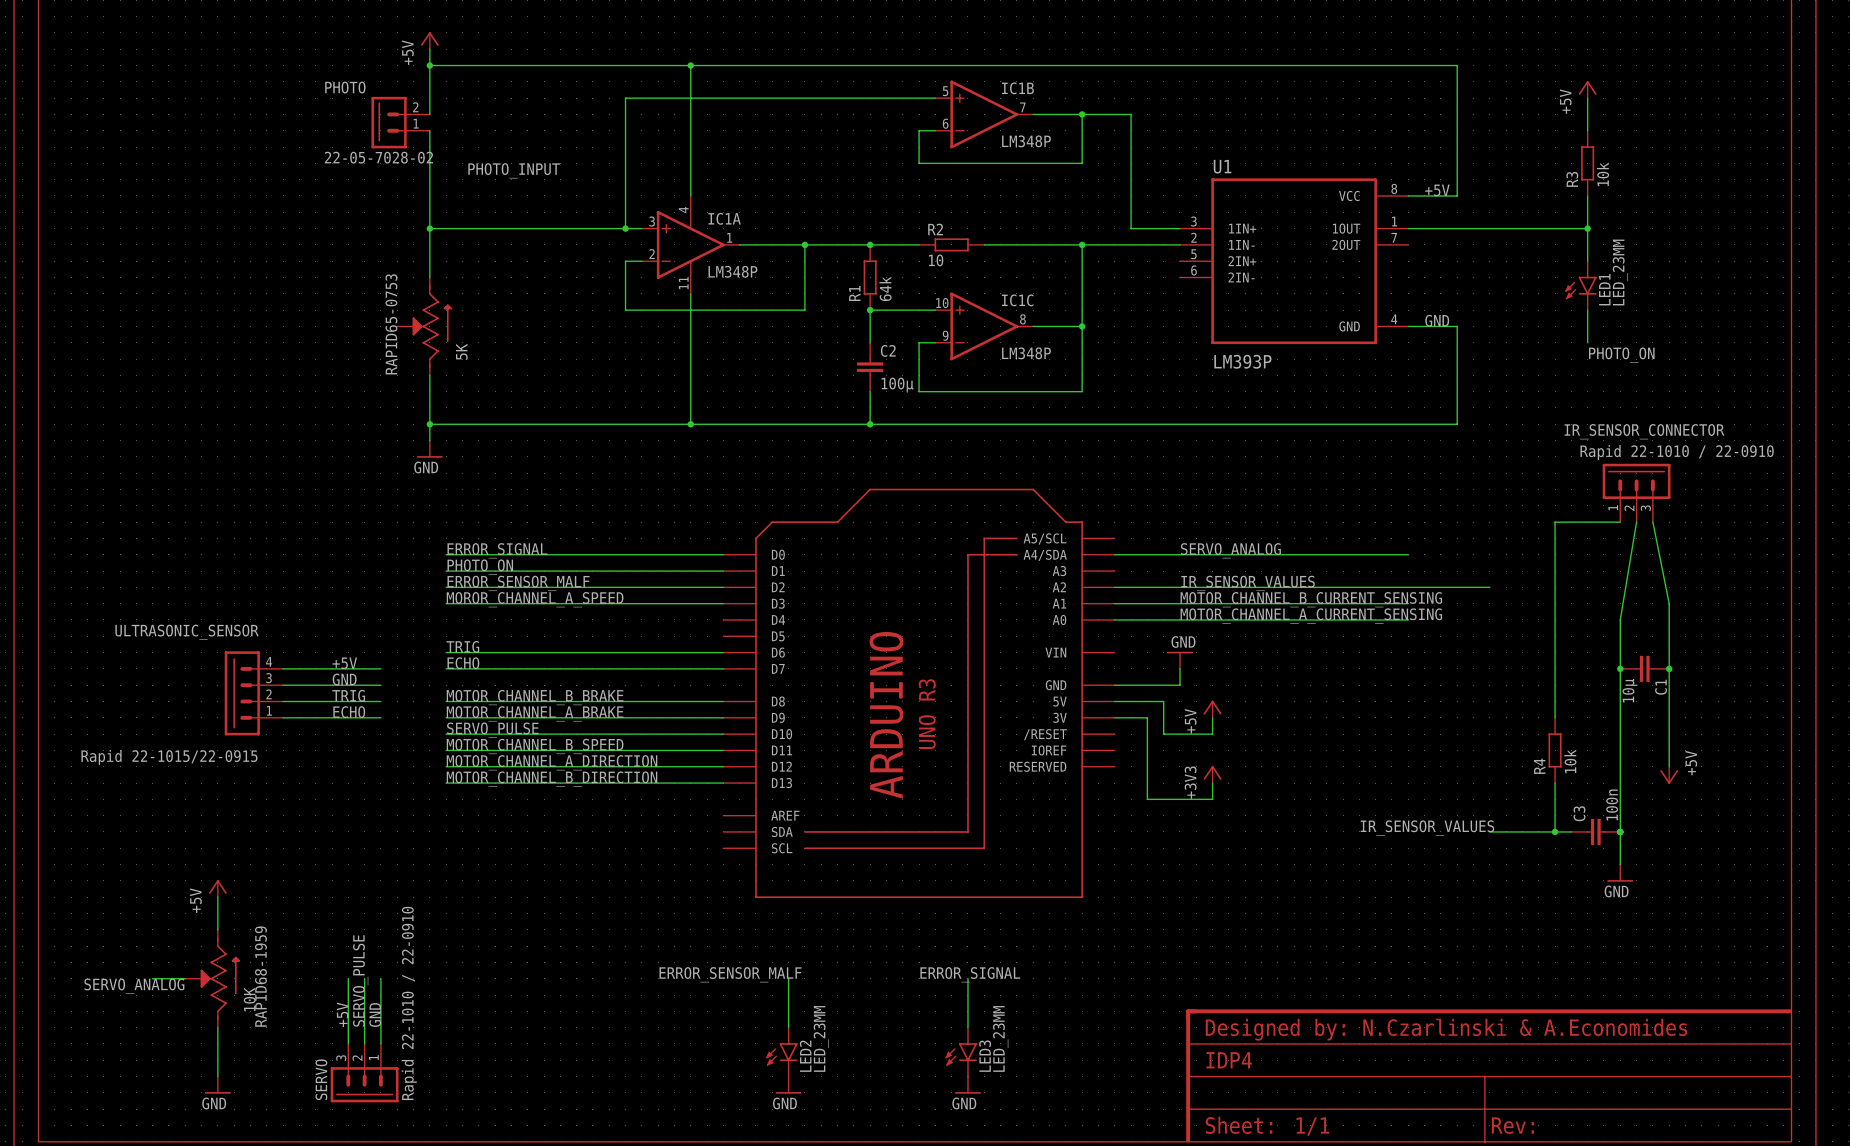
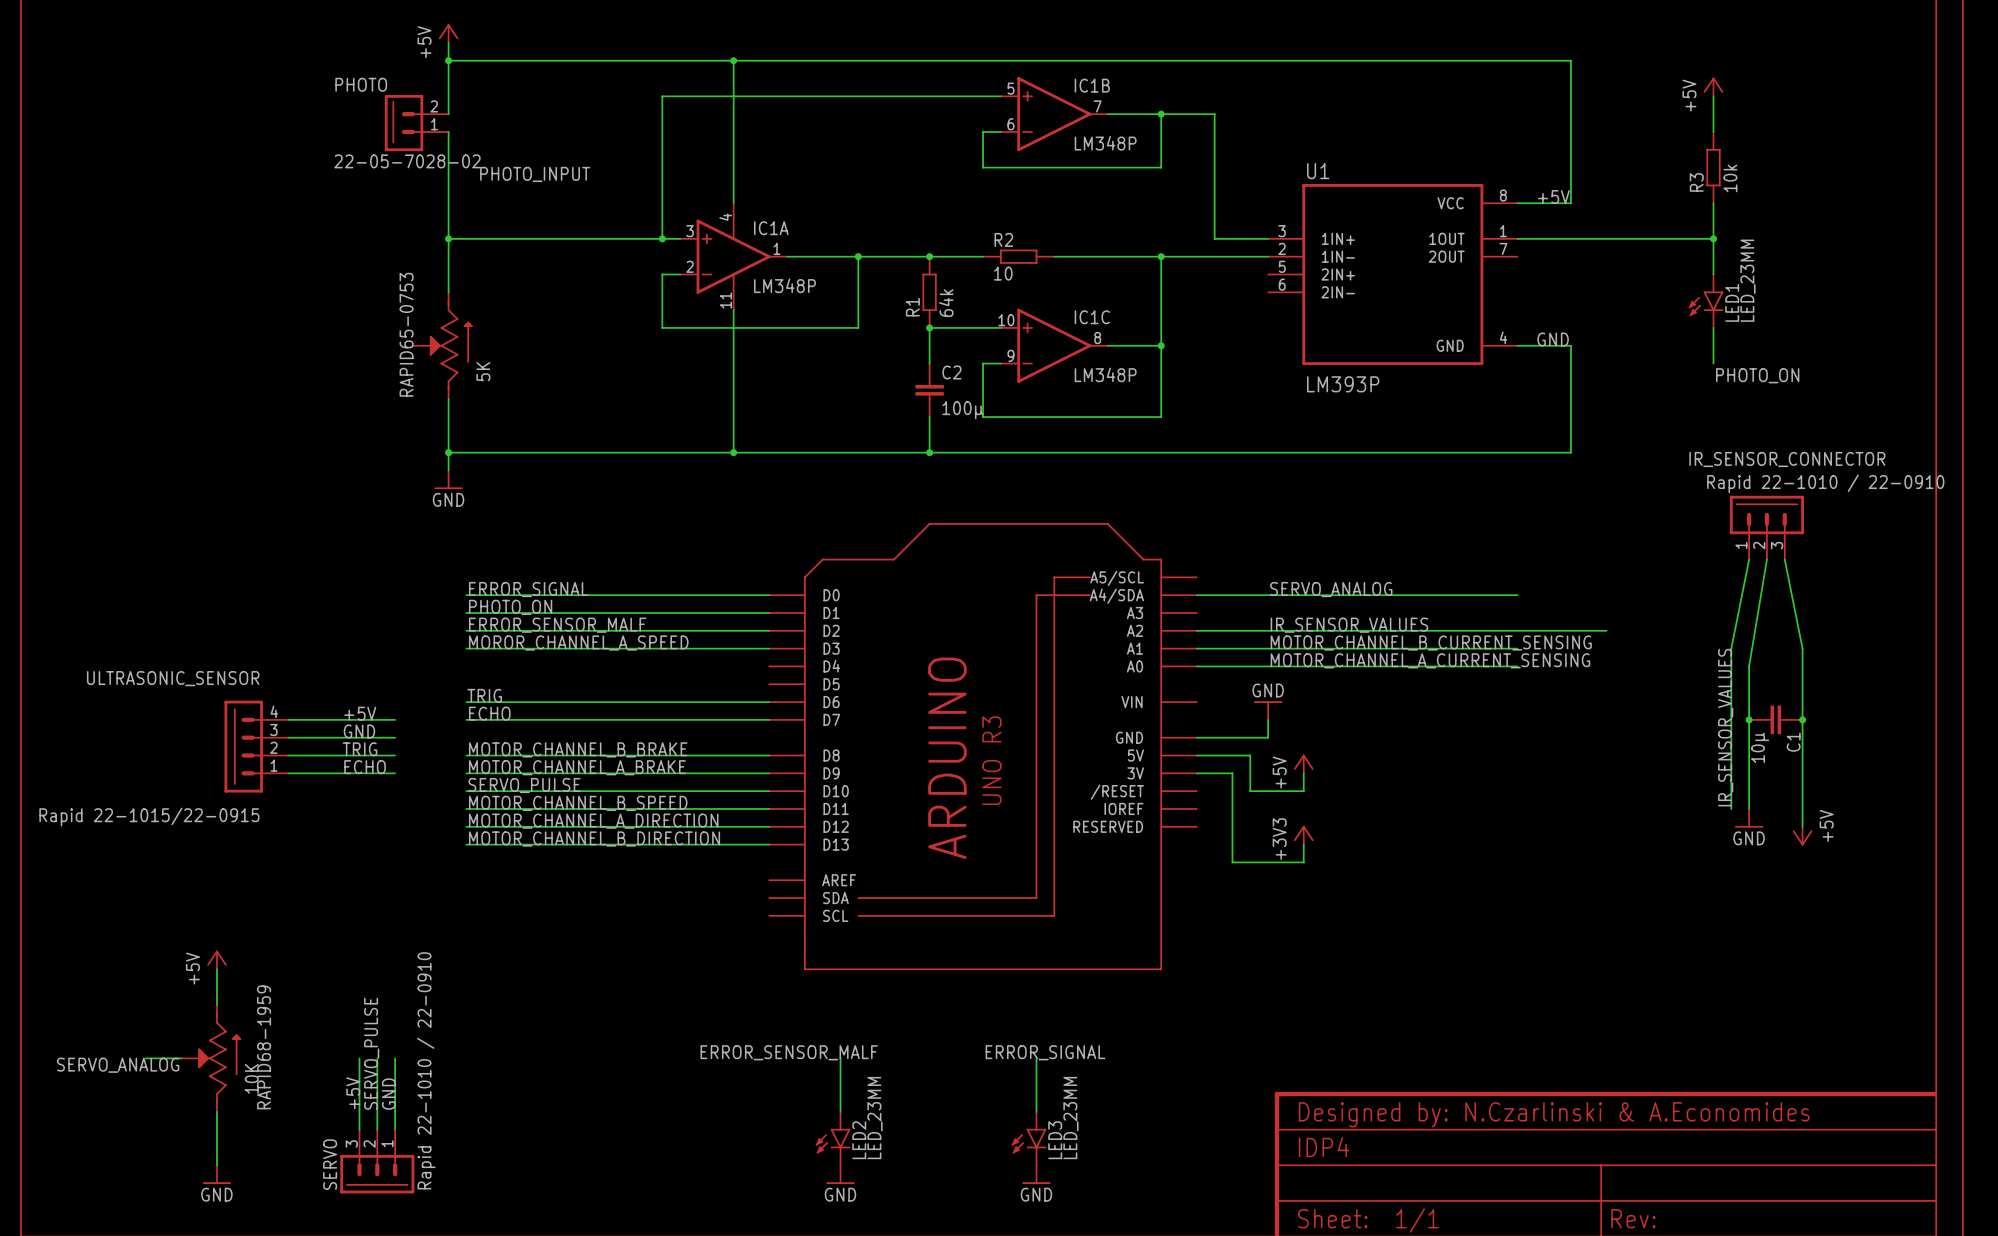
wire: (1620, 522) (1555, 522) (1555, 717) -> (1749, 559) (1731, 648) (1731, 808)
label: none -> IR_SENSOR_VALUES (1725, 727)
R4: 10k (1555, 750) -> none
wire: (1620, 750) (1620, 864) -> none
wire: (1555, 783) (1555, 831) -> none
label: IR_SENSOR_VALUES (1427, 828) -> none
wire: (1489, 831) (1571, 831) -> none
junction: (1555, 831) -> none
C3: 100n (1595, 831) -> none
junction: (1620, 831) -> none
power symbol position: GND (1620, 873) -> GND (1749, 818)

